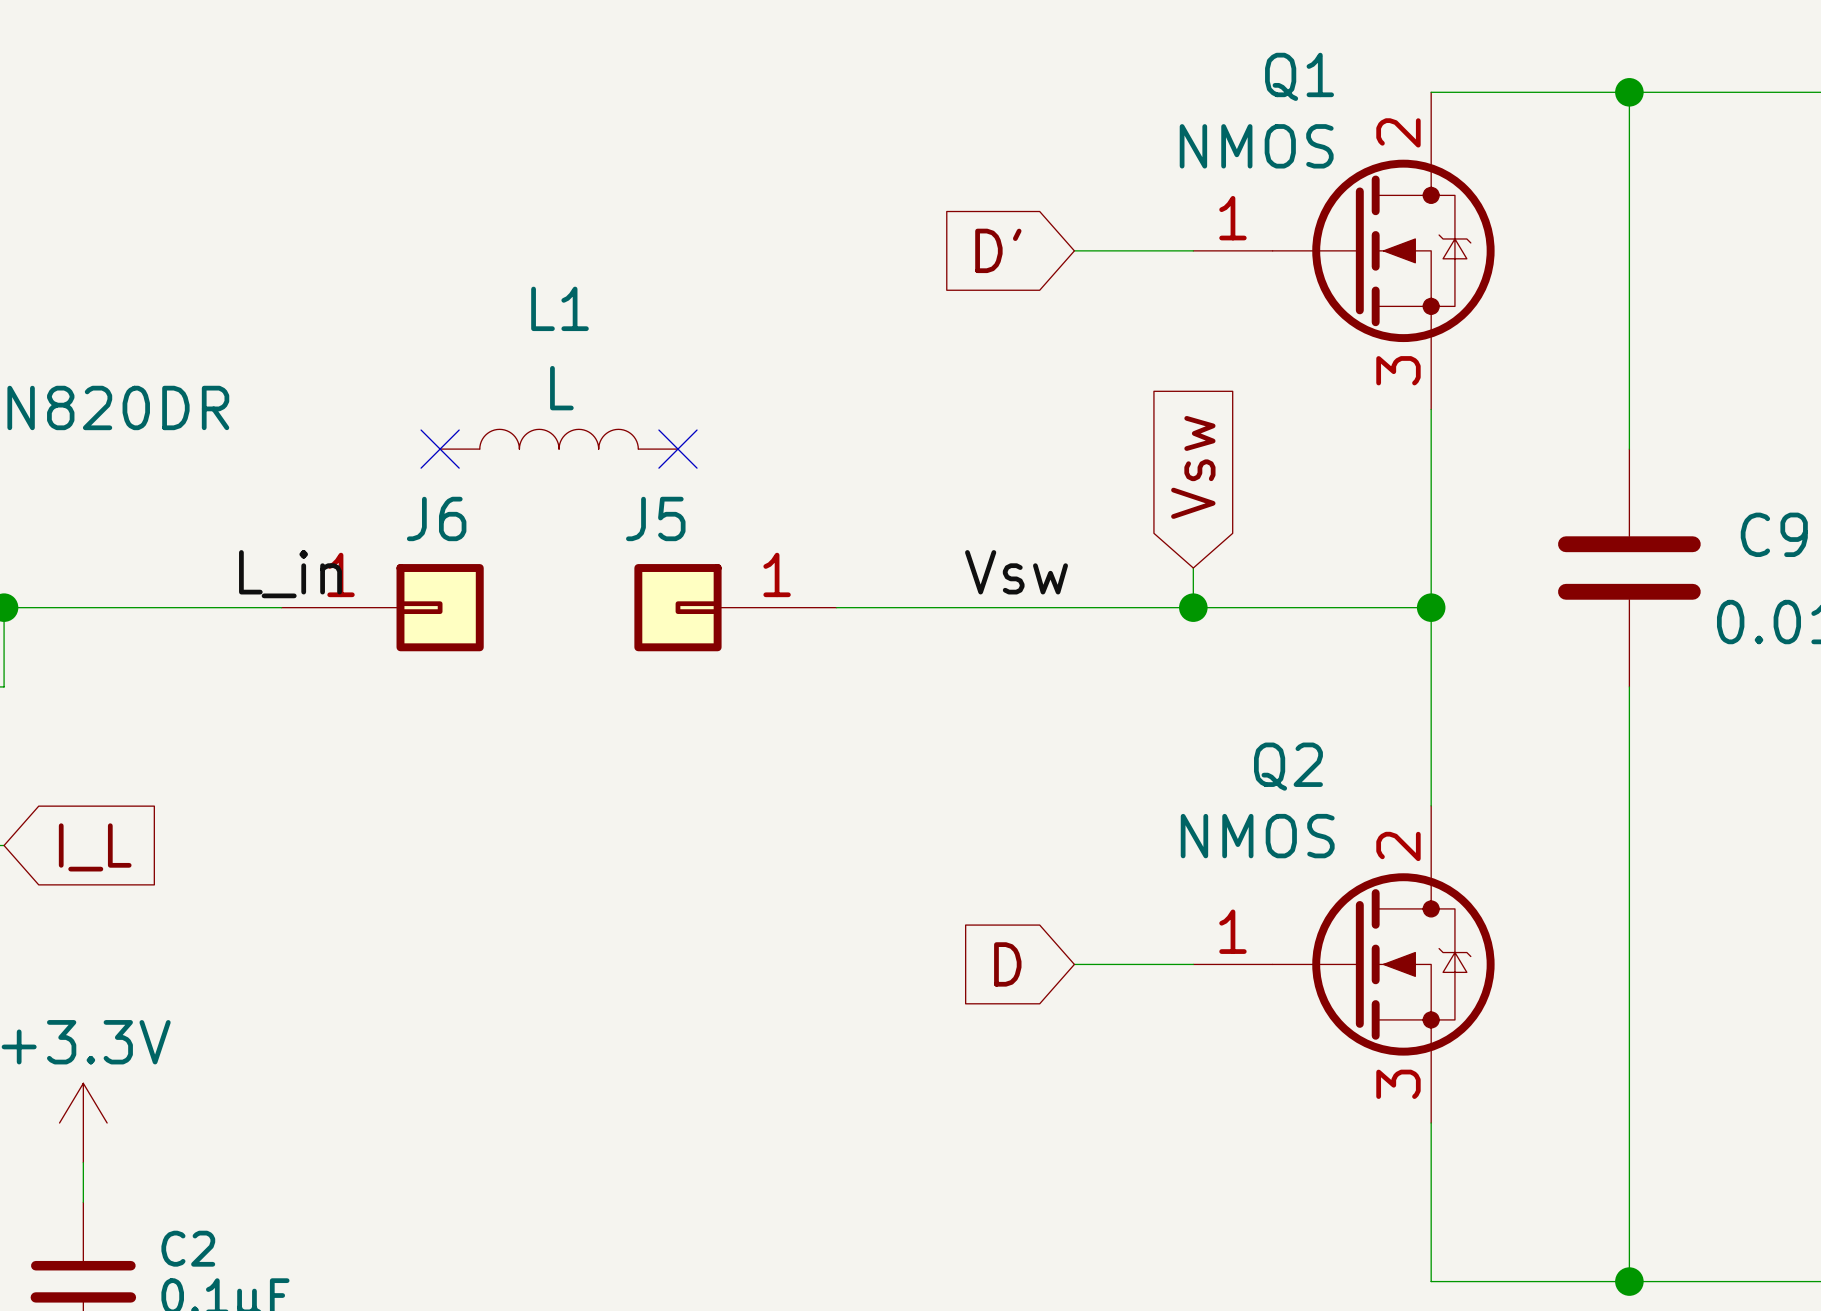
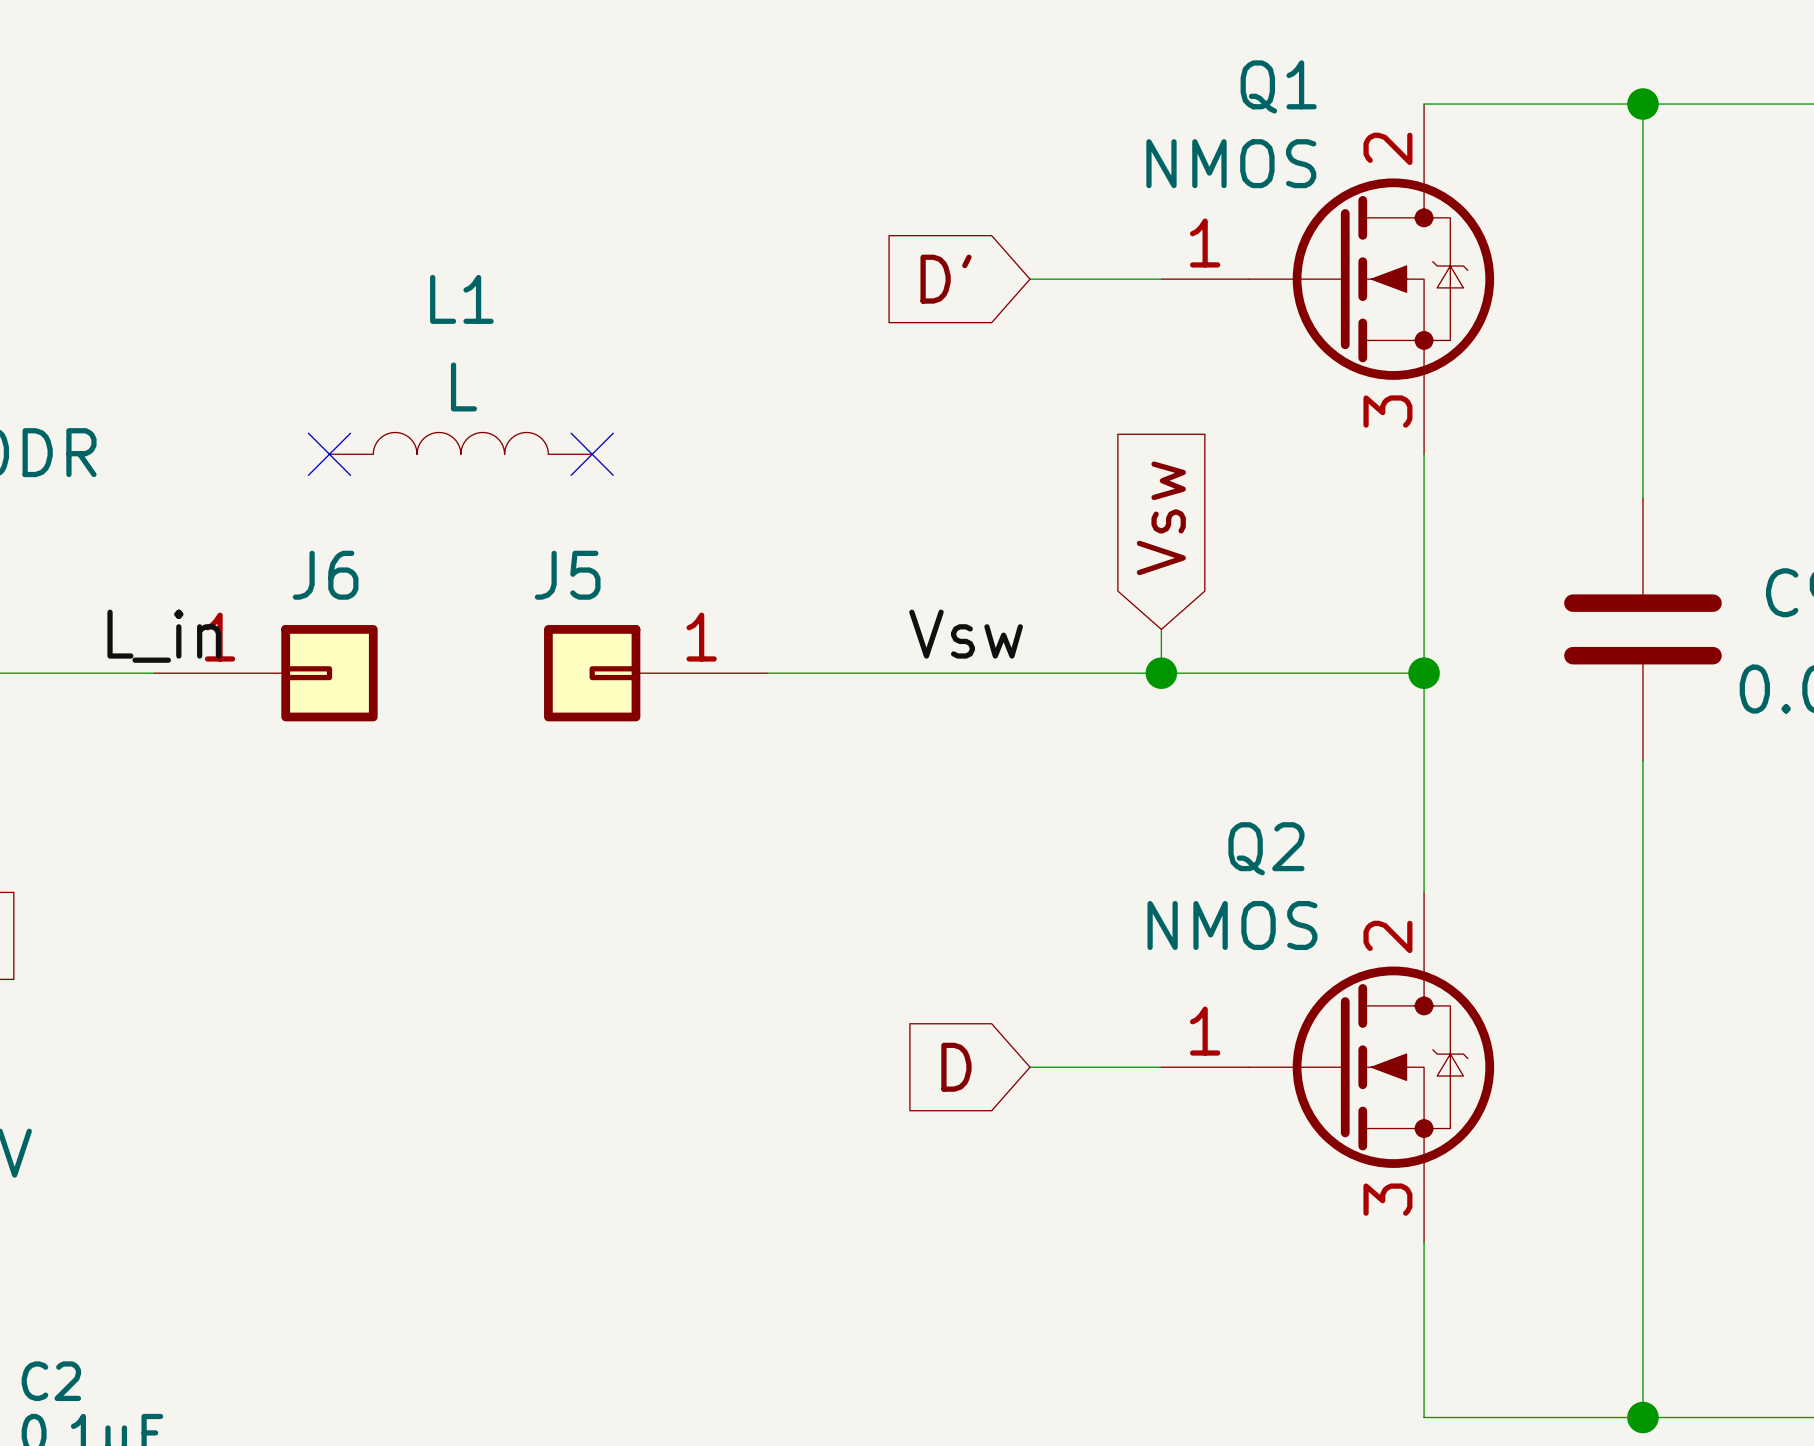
L1 position: (559, 439) -> (460, 443)
no-connect mark position: (440, 449) -> (329, 454)
no-connect mark position: (677, 449) -> (592, 454)

